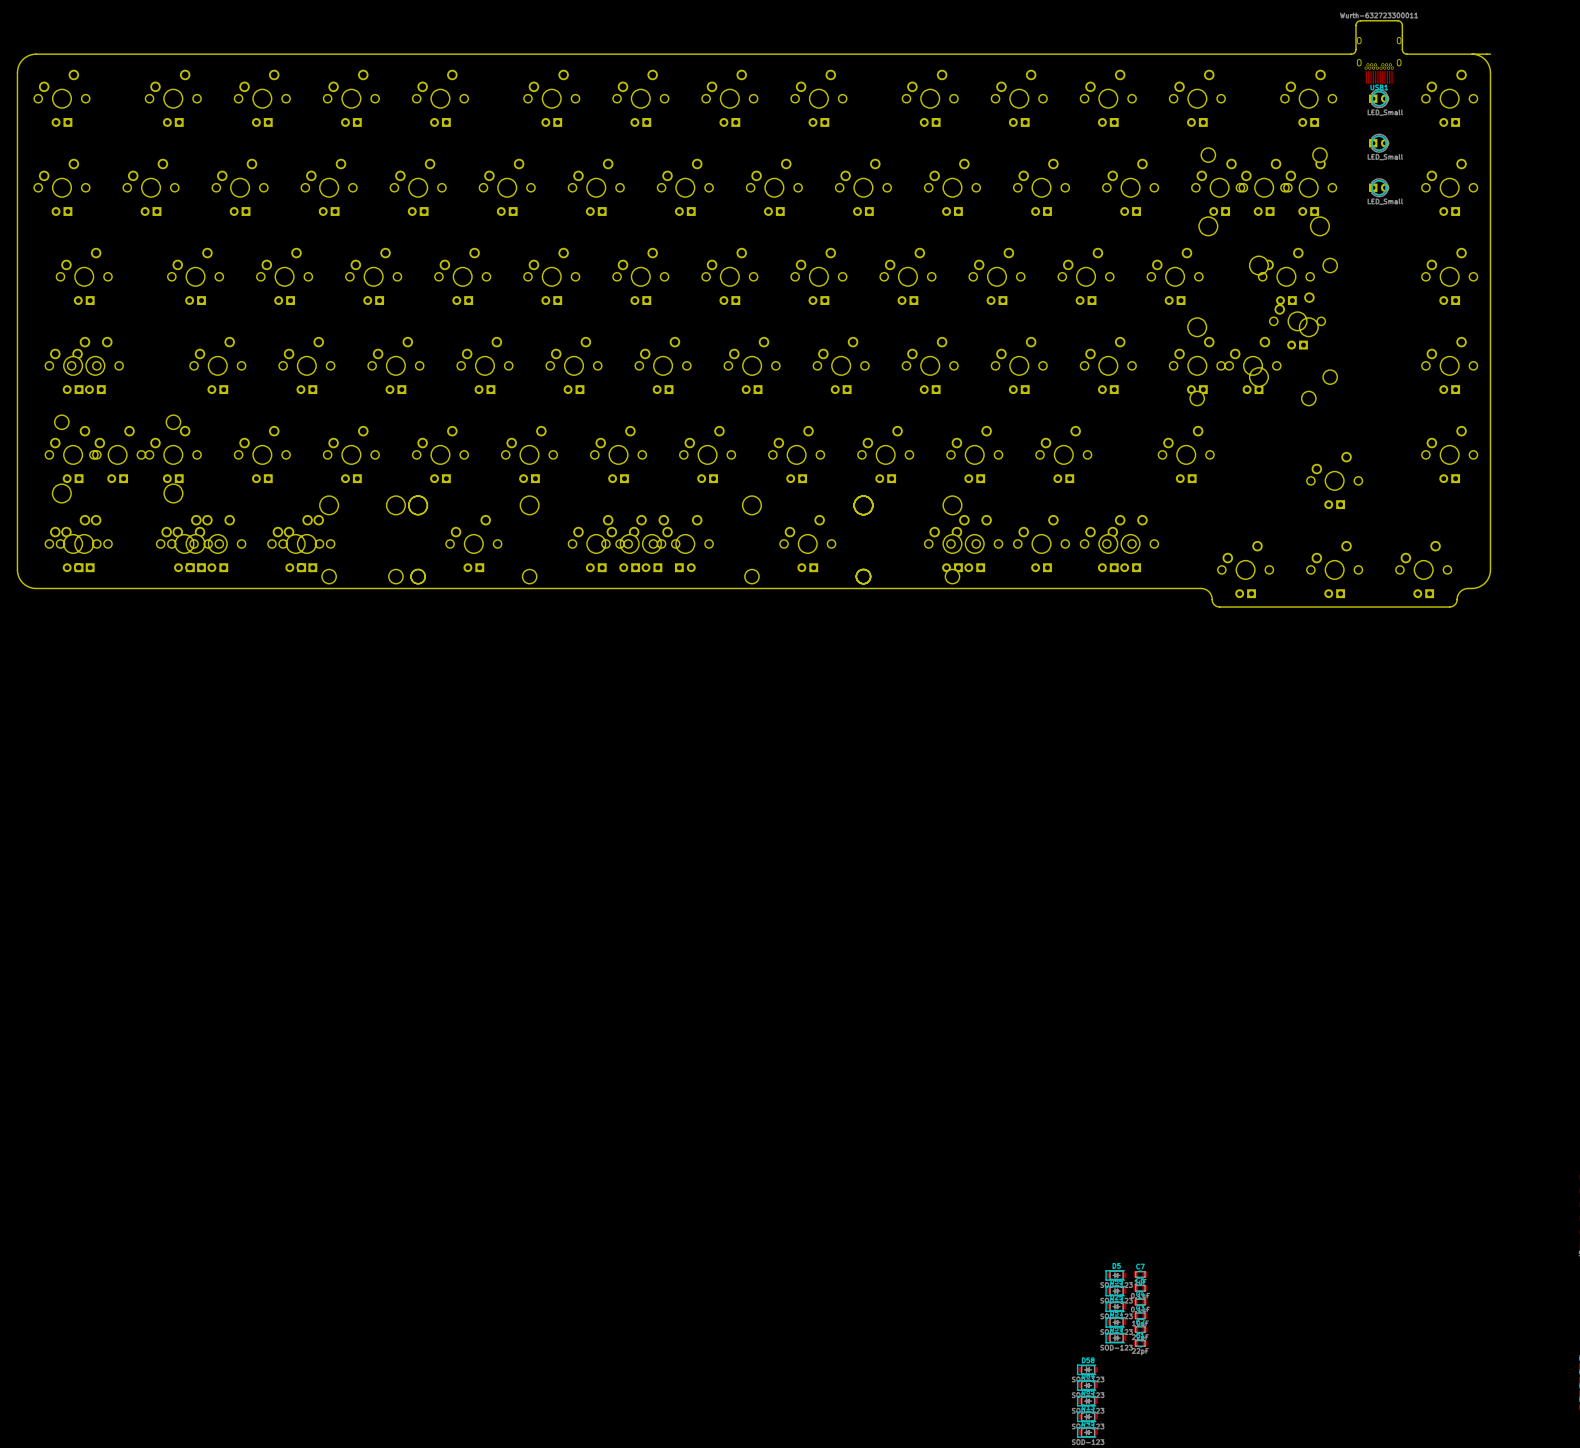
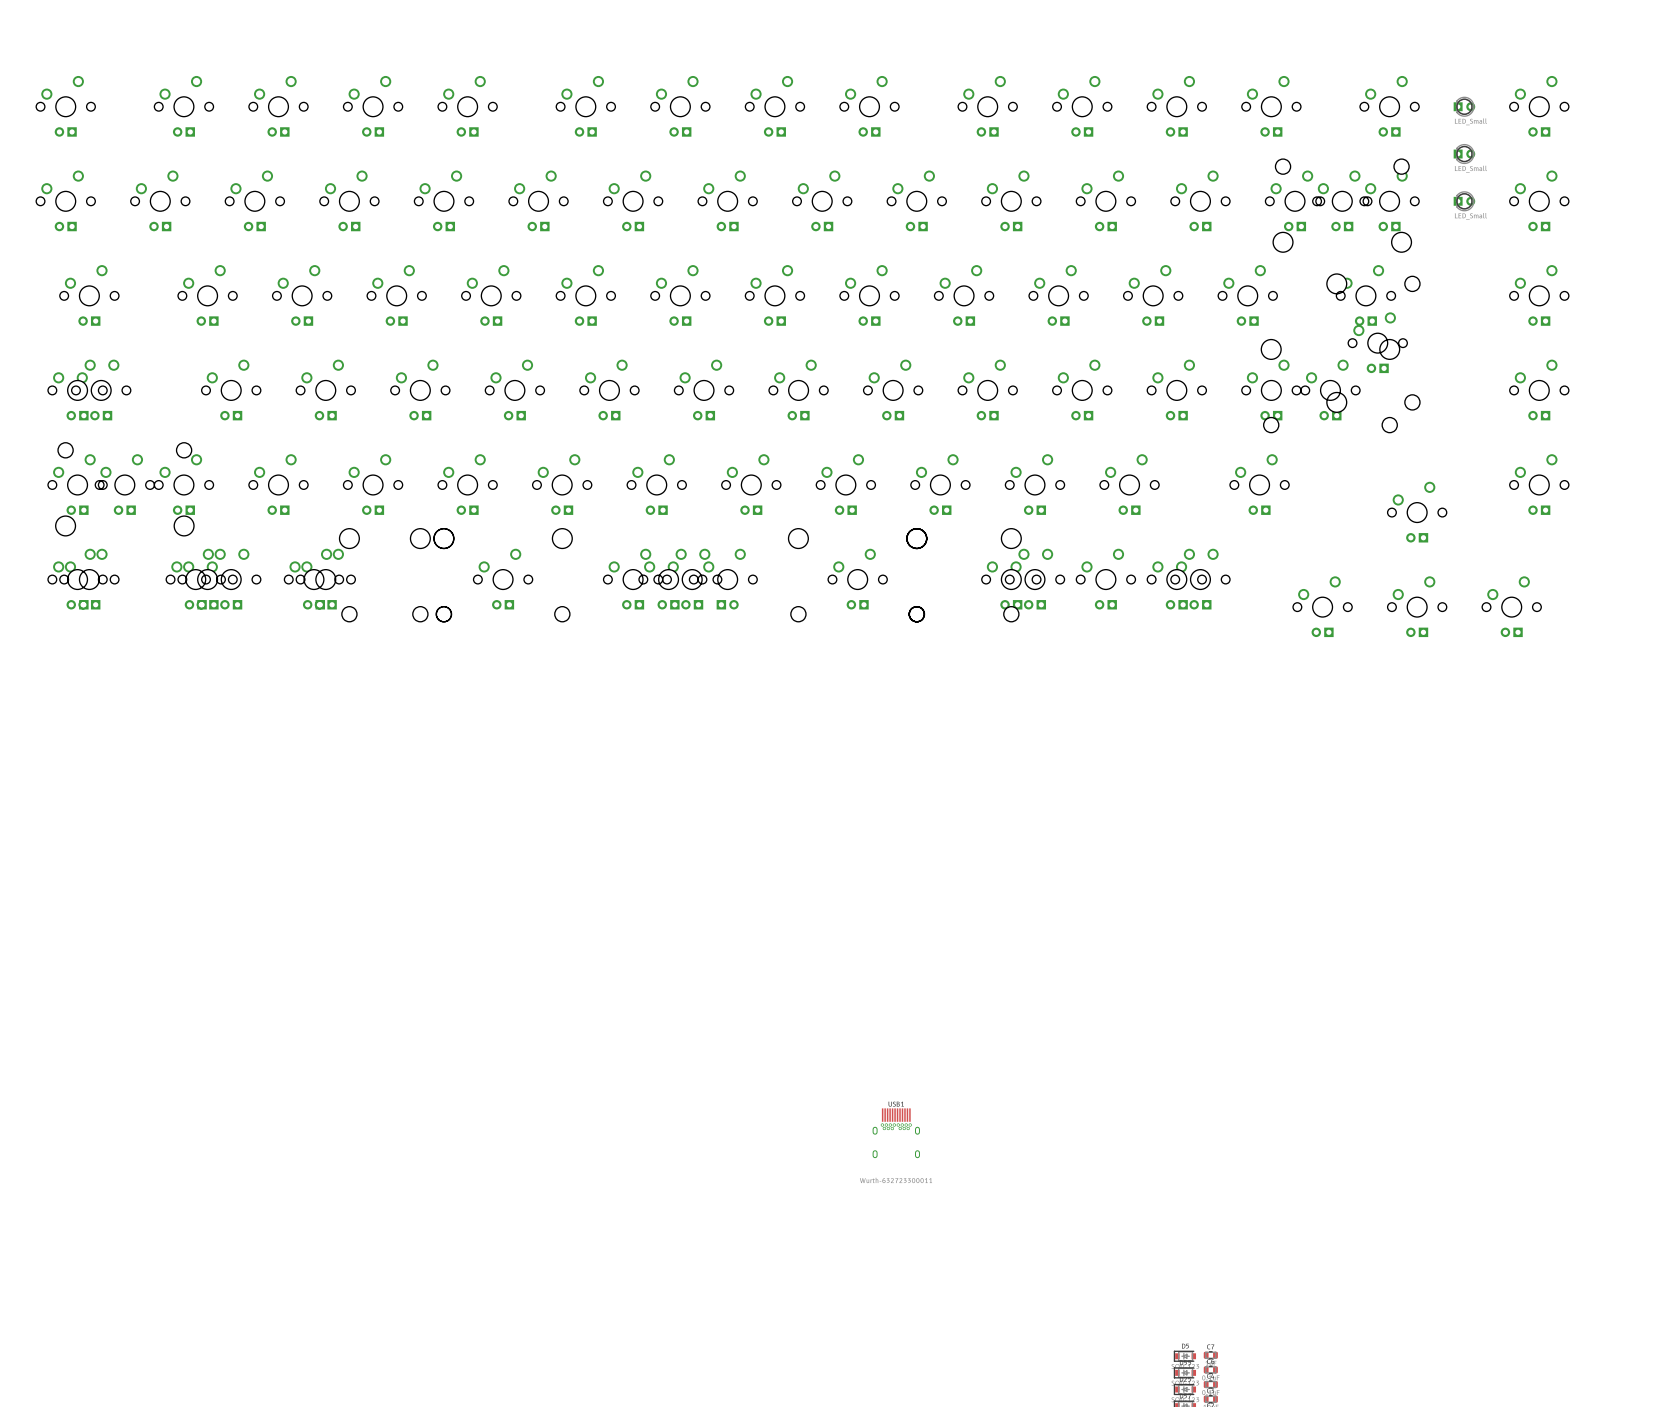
board edge: (1471, 54) (1485, 59) (1490, 72) (1490, 569) (1485, 583) (1476, 587) (1461, 590) (1456, 603) (1452, 606) (1218, 606) (1213, 603) (1208, 591) (1201, 588) (36, 588) (26, 585) (18, 577) (17, 72) (19, 63) (28, 55) (1351, 54) (1355, 50) (1356, 24) (1360, 20) (1400, 21) (1402, 25) (1402, 50) (1405, 54) (1490, 54) -> none
part rotation: 0° (1379, 60) -> 180° (896, 1133)
part position: (1379, 60) -> (896, 1133)

